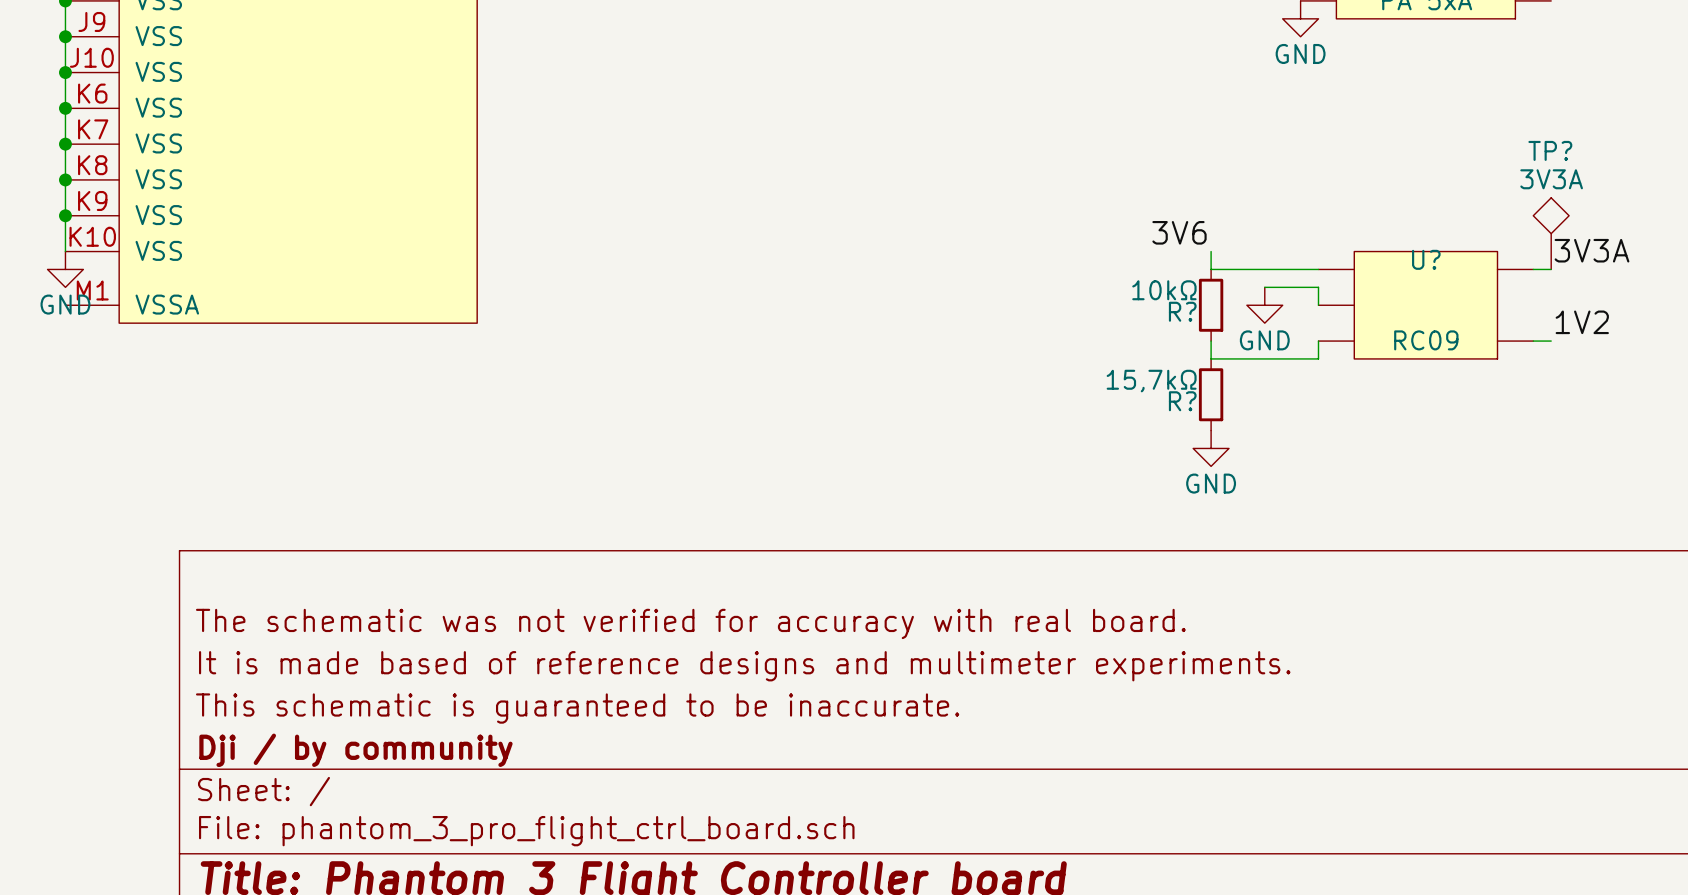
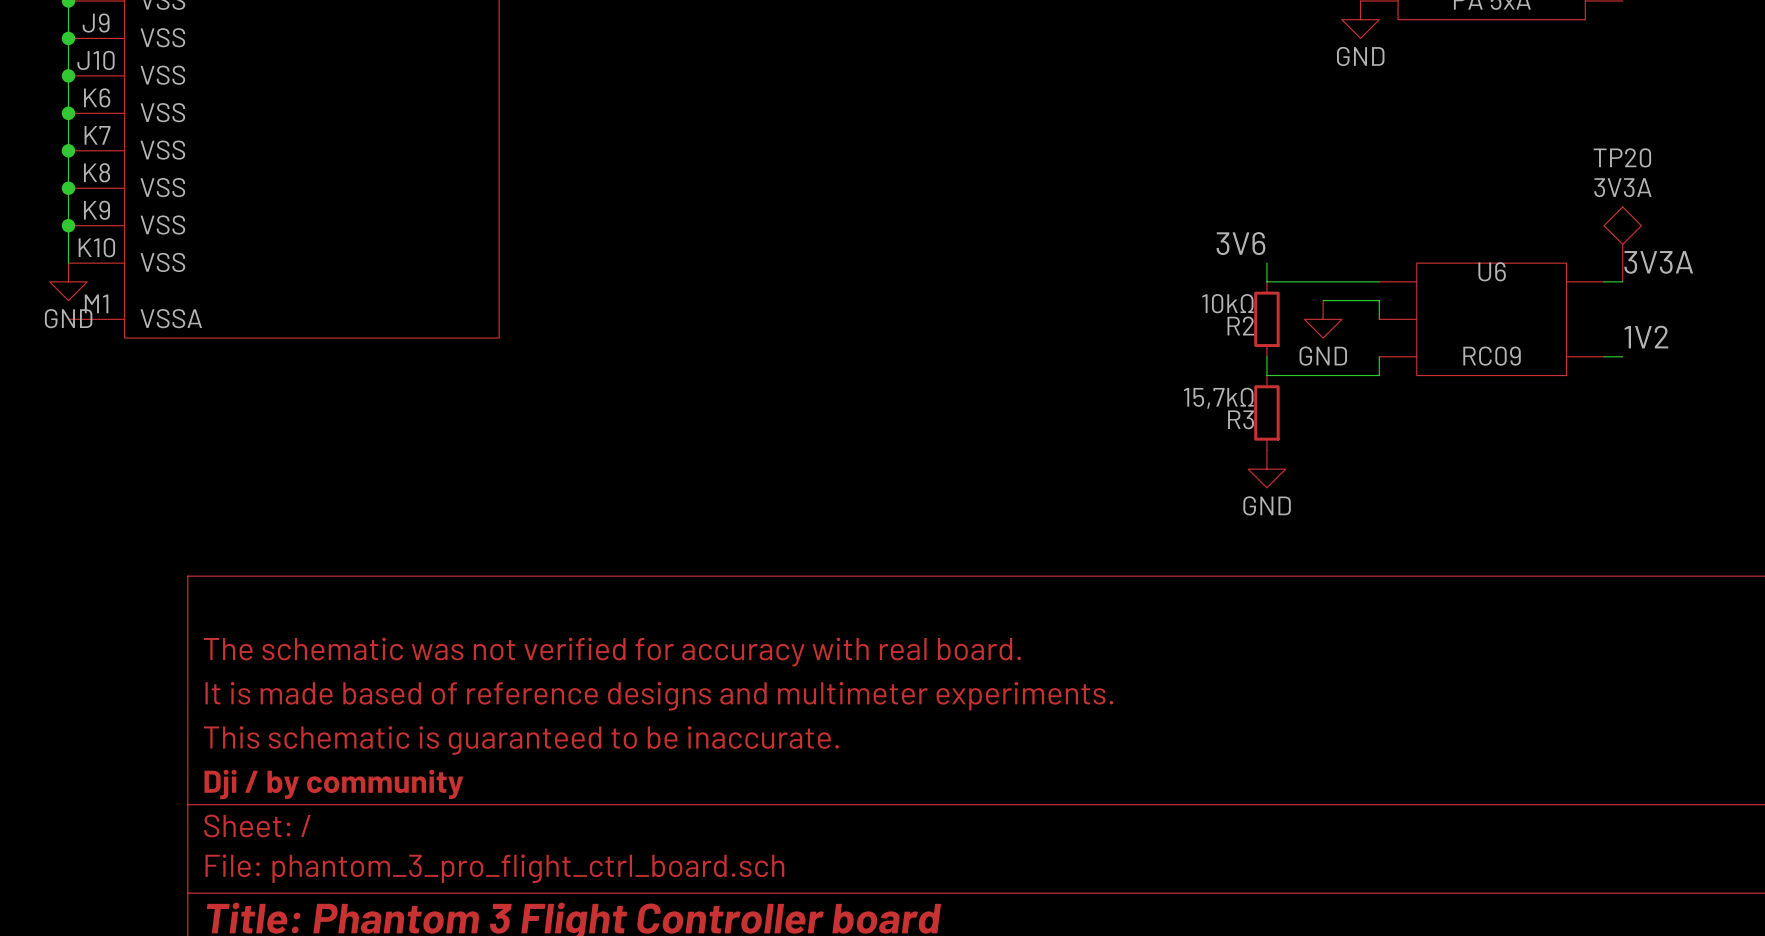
TP? name: TP? (1550, 150) -> TP20 (1622, 157)
U? name: U? (1426, 259) -> U6 (1492, 271)
R? name: R? (1182, 311) -> R2 (1240, 326)
R? name: R? (1182, 401) -> R3 (1241, 419)

